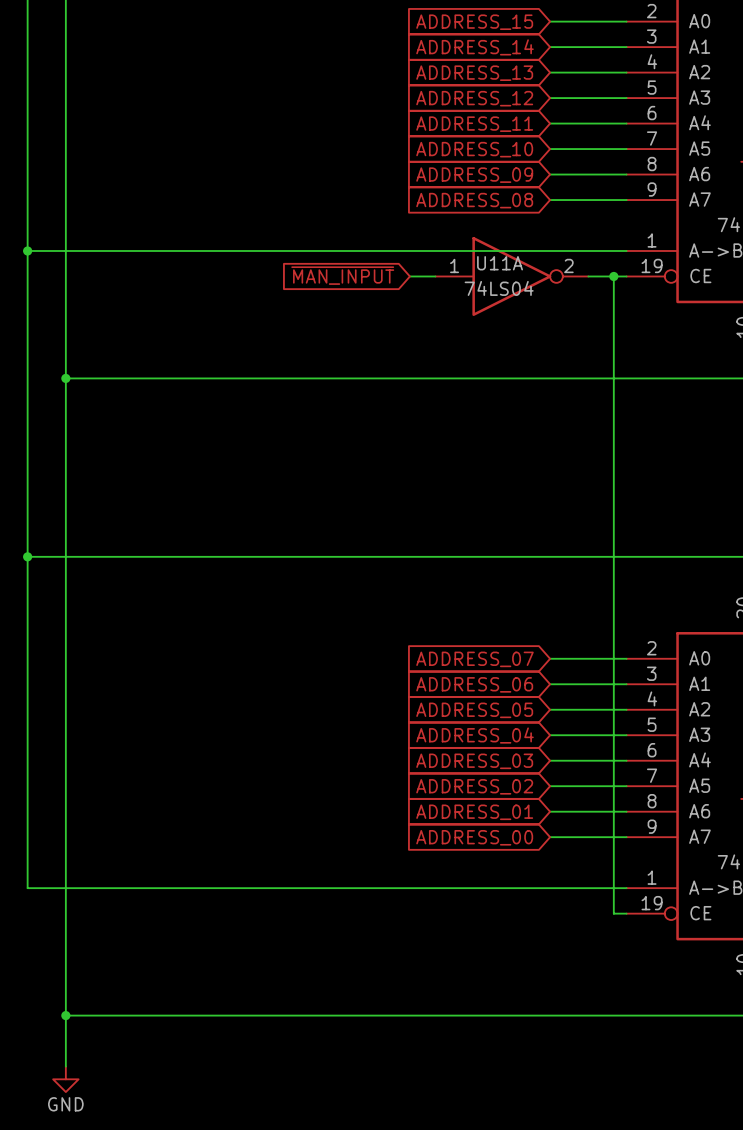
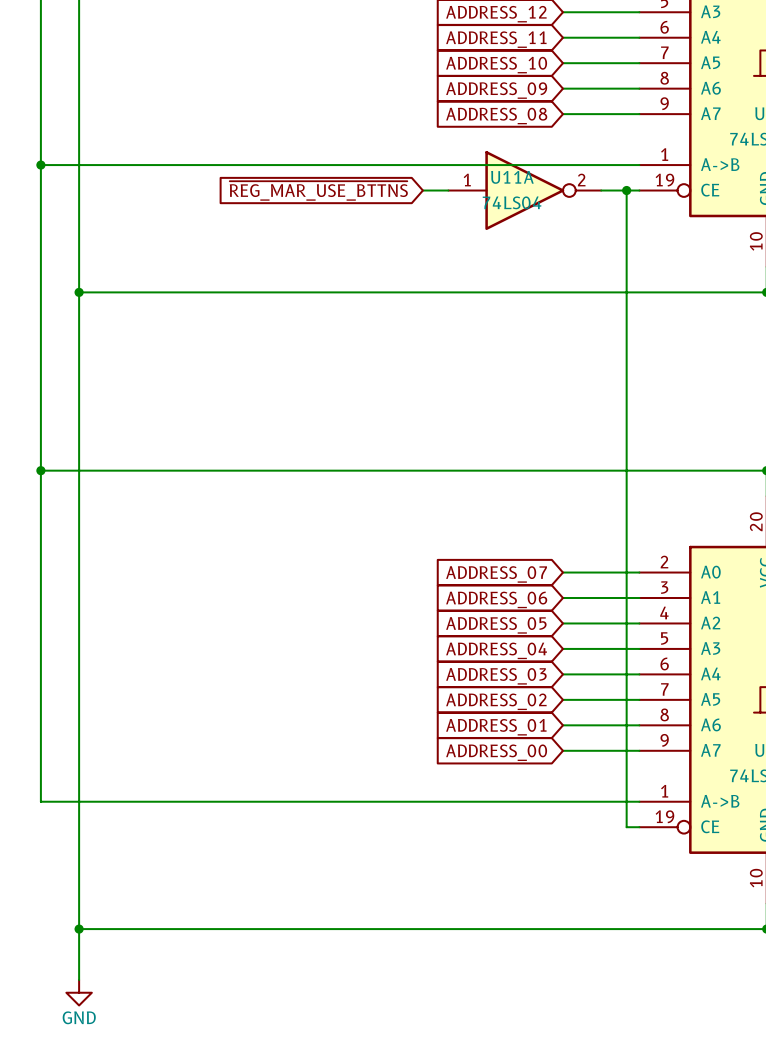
global label: ~{MAN_INPUT} (342, 275) -> ~{REG_MAR_USE_BTTNS} (318, 190)

